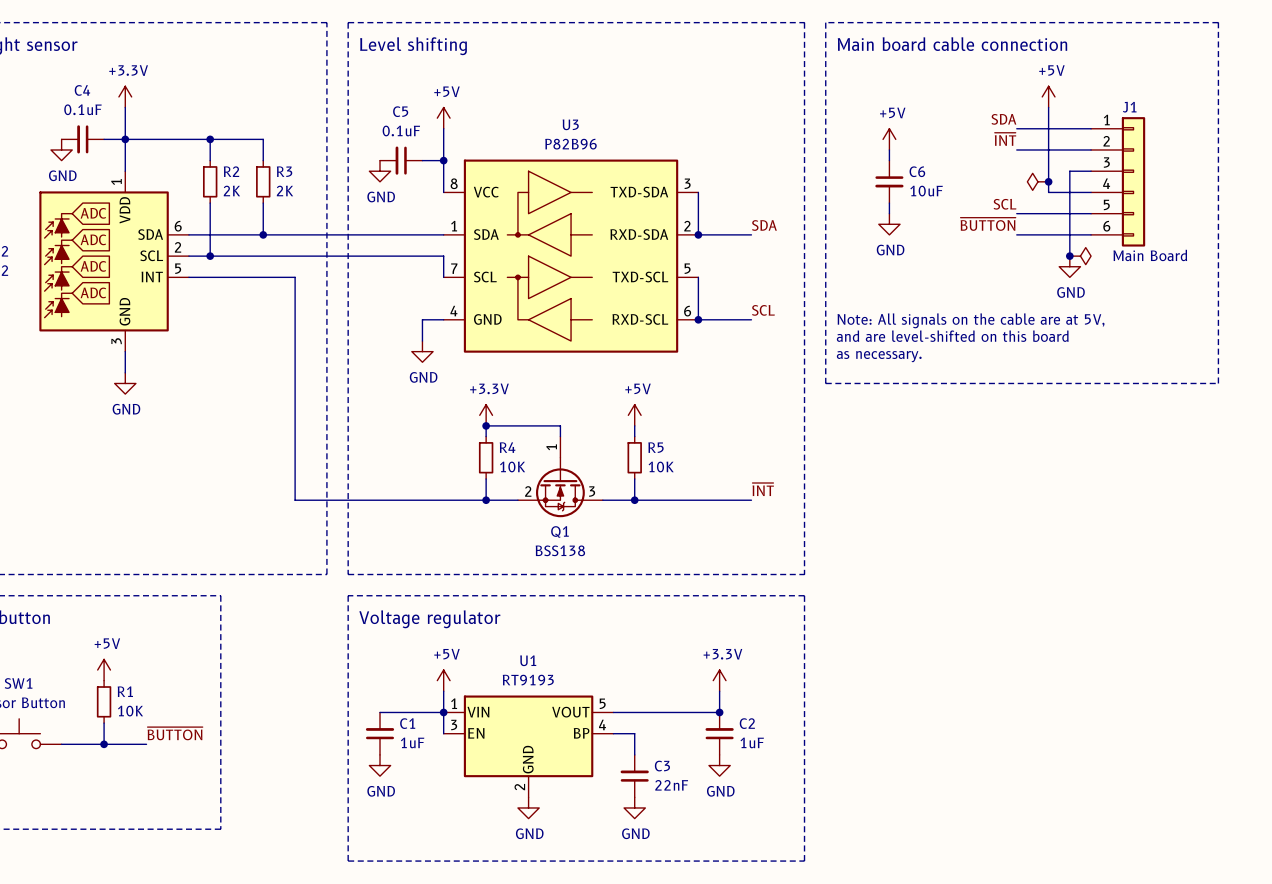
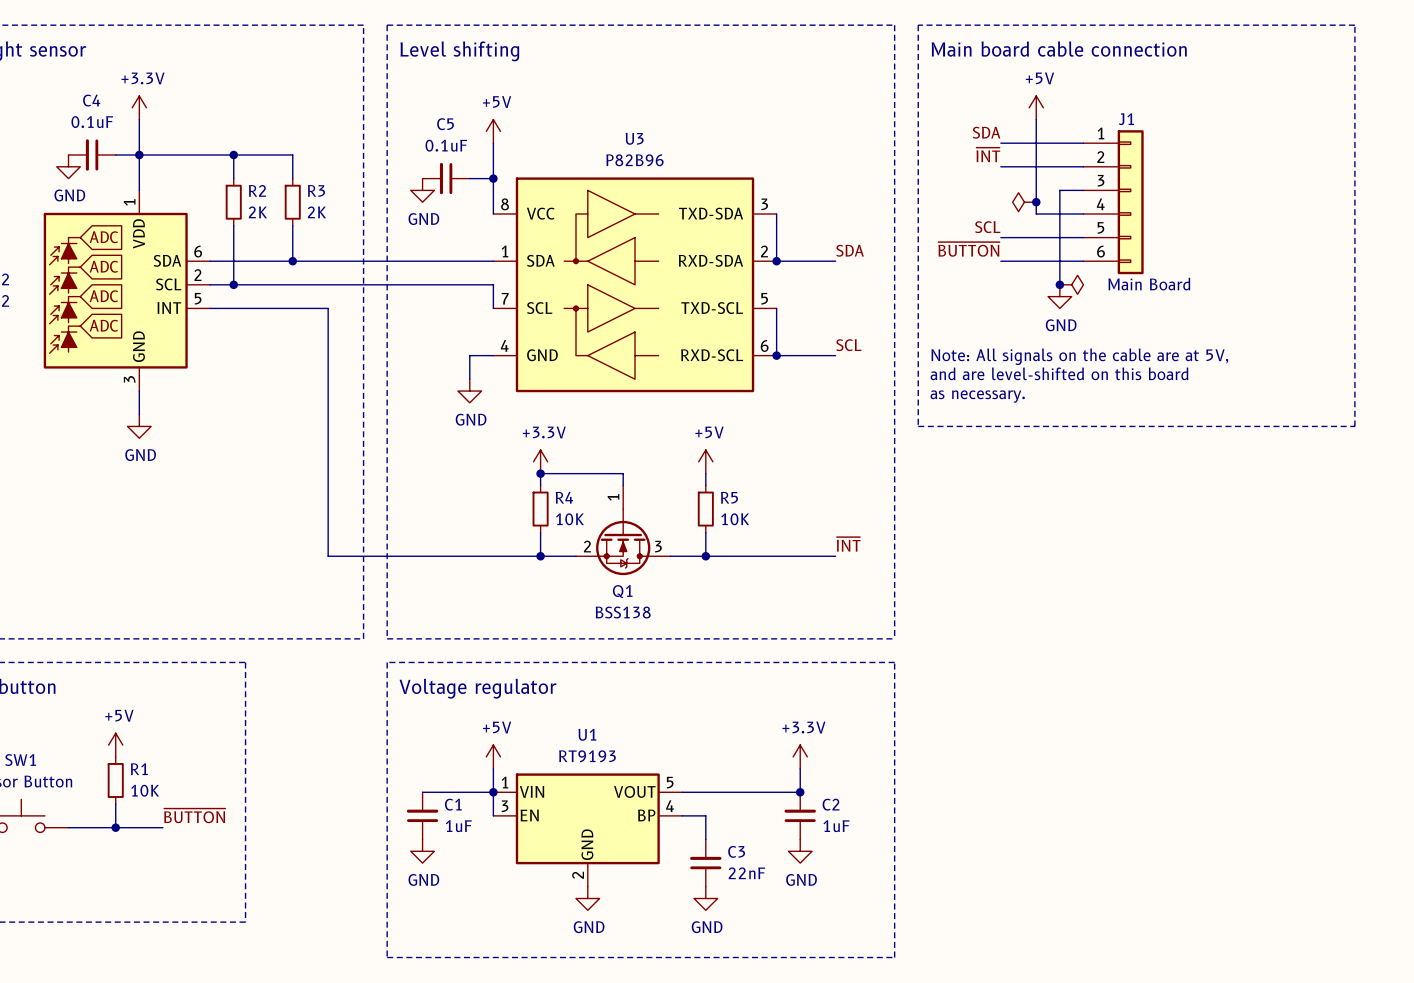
power symbol: none -> +5V (1036, 107)
power symbol: +5V (1048, 96) -> none
wire: (1048, 107) (1048, 192) (1091, 192) -> (1036, 119) (1036, 214) (1083, 214)
label position: SDA (1003, 119) -> SDA (986, 132)
wire: (1016, 128) (1091, 128) -> (1000, 143) (1083, 143)
power symbol: +5V (889, 139) -> none
label position: ~{INT} (1005, 139) -> ~{INT} (988, 154)
wire: (889, 149) (889, 160) -> none
wire: (1016, 149) (1091, 149) -> (1000, 166) (1083, 166)
wire: (1091, 171) (1069, 171) (1069, 256) -> (1083, 190) (1059, 190) (1059, 284)
C6: 10uF (889, 181) -> none
power symbol: none -> (1024, 202)
junction: none -> (1036, 202)
power symbol: (1037, 181) -> none
junction: (1048, 181) -> none
J1 position: (1118, 181) -> (1113, 202)
wire: (889, 203) (889, 213) -> none
label position: SCL (1004, 204) -> SCL (987, 227)
wire: (1016, 213) (1091, 213) -> (1000, 237) (1083, 237)
power symbol: GND (889, 224) -> none
label position: ~{BUTTON} (988, 224) -> ~{BUTTON} (969, 249)
wire: (1016, 234) (1091, 234) -> (1000, 261) (1083, 261)
junction: none -> (1059, 284)
power symbol: none -> (1071, 284)
junction: (1069, 256) -> none
power symbol: (1080, 256) -> none
power symbol: none -> GND (1059, 296)
power symbol: GND (1069, 266) -> none

